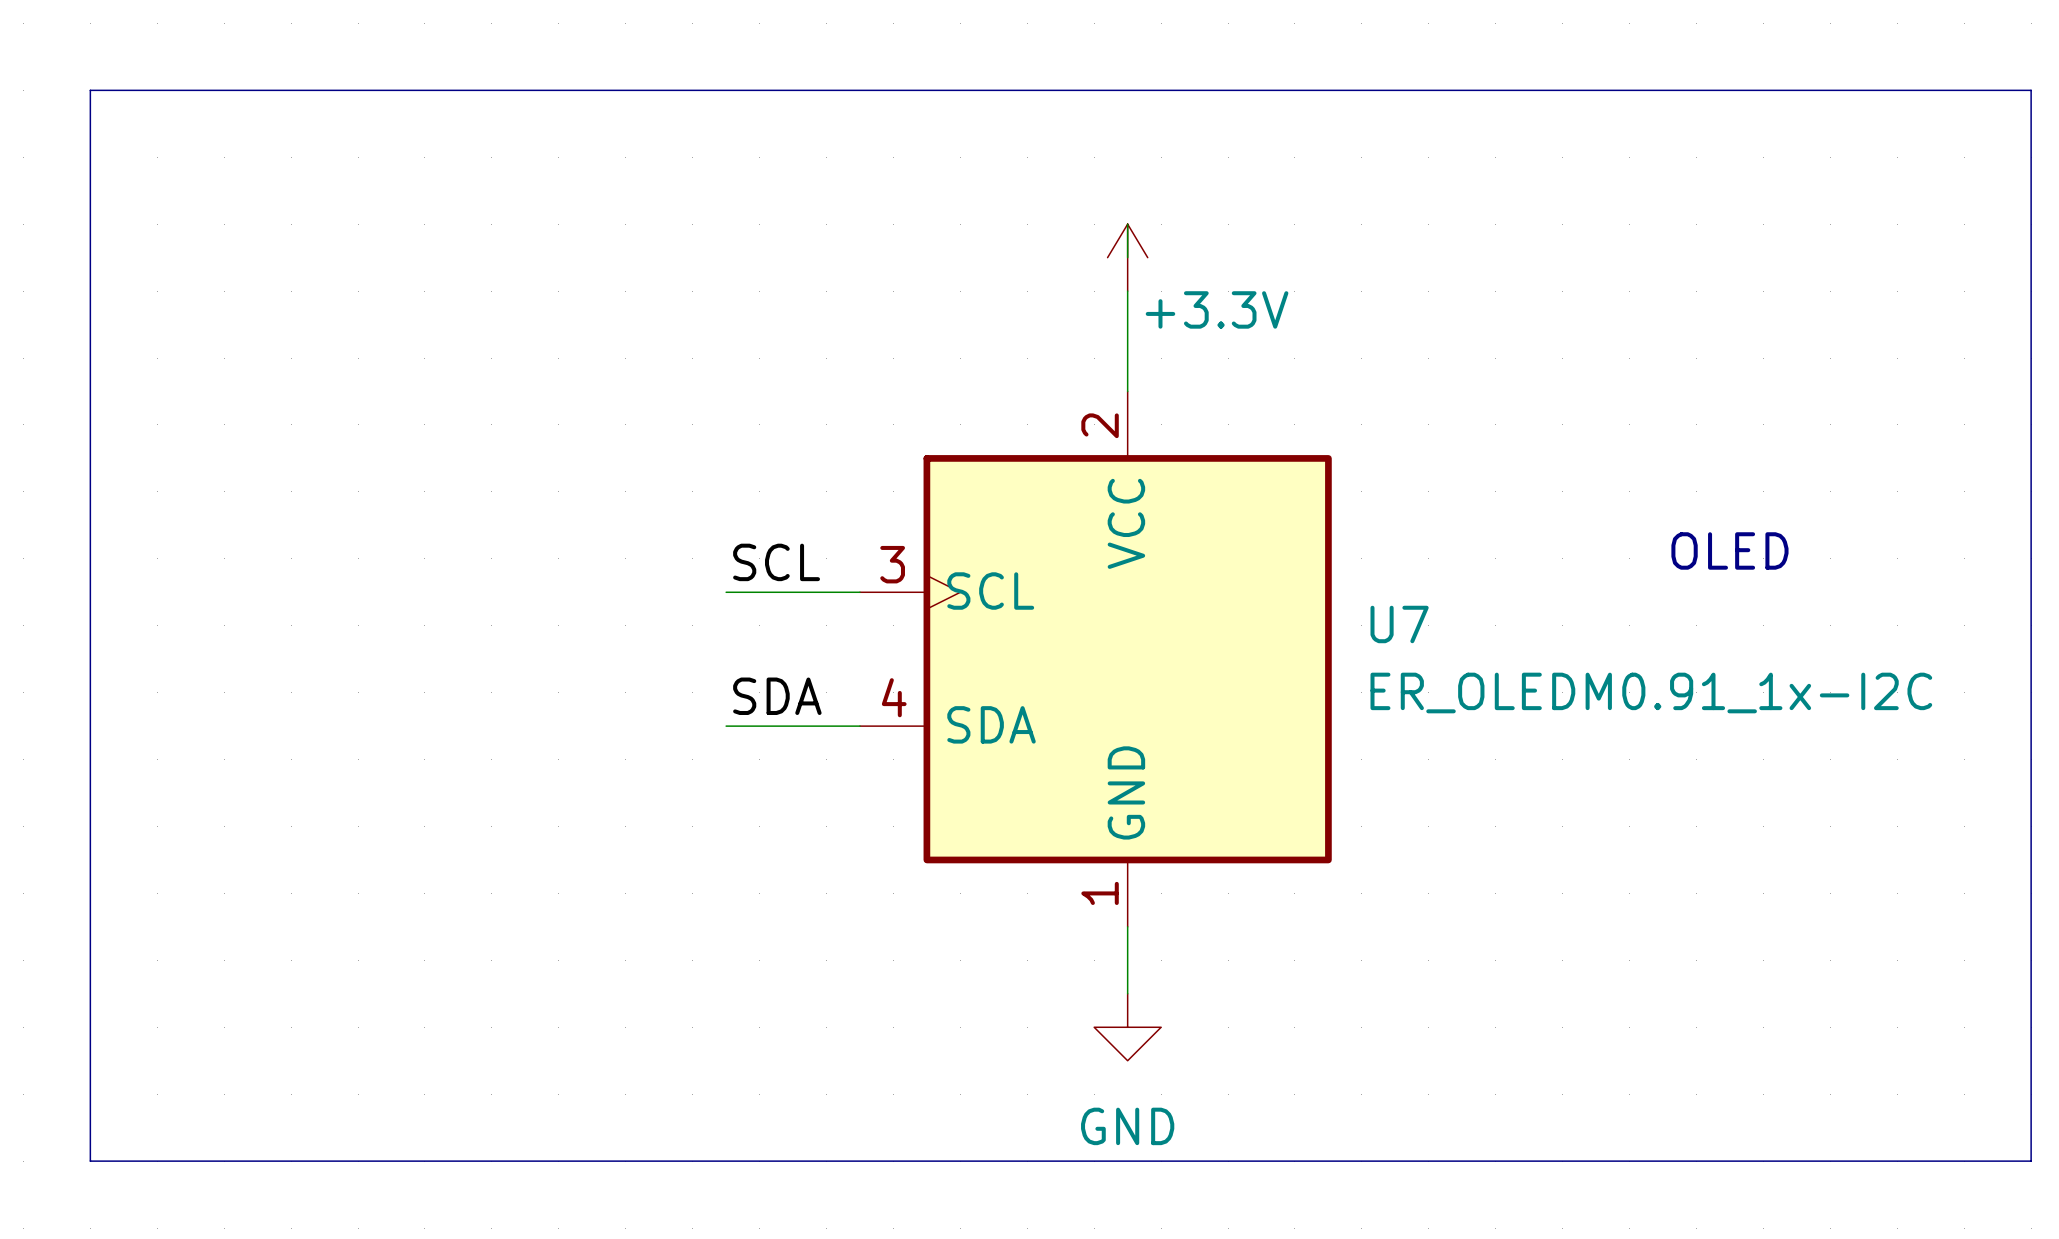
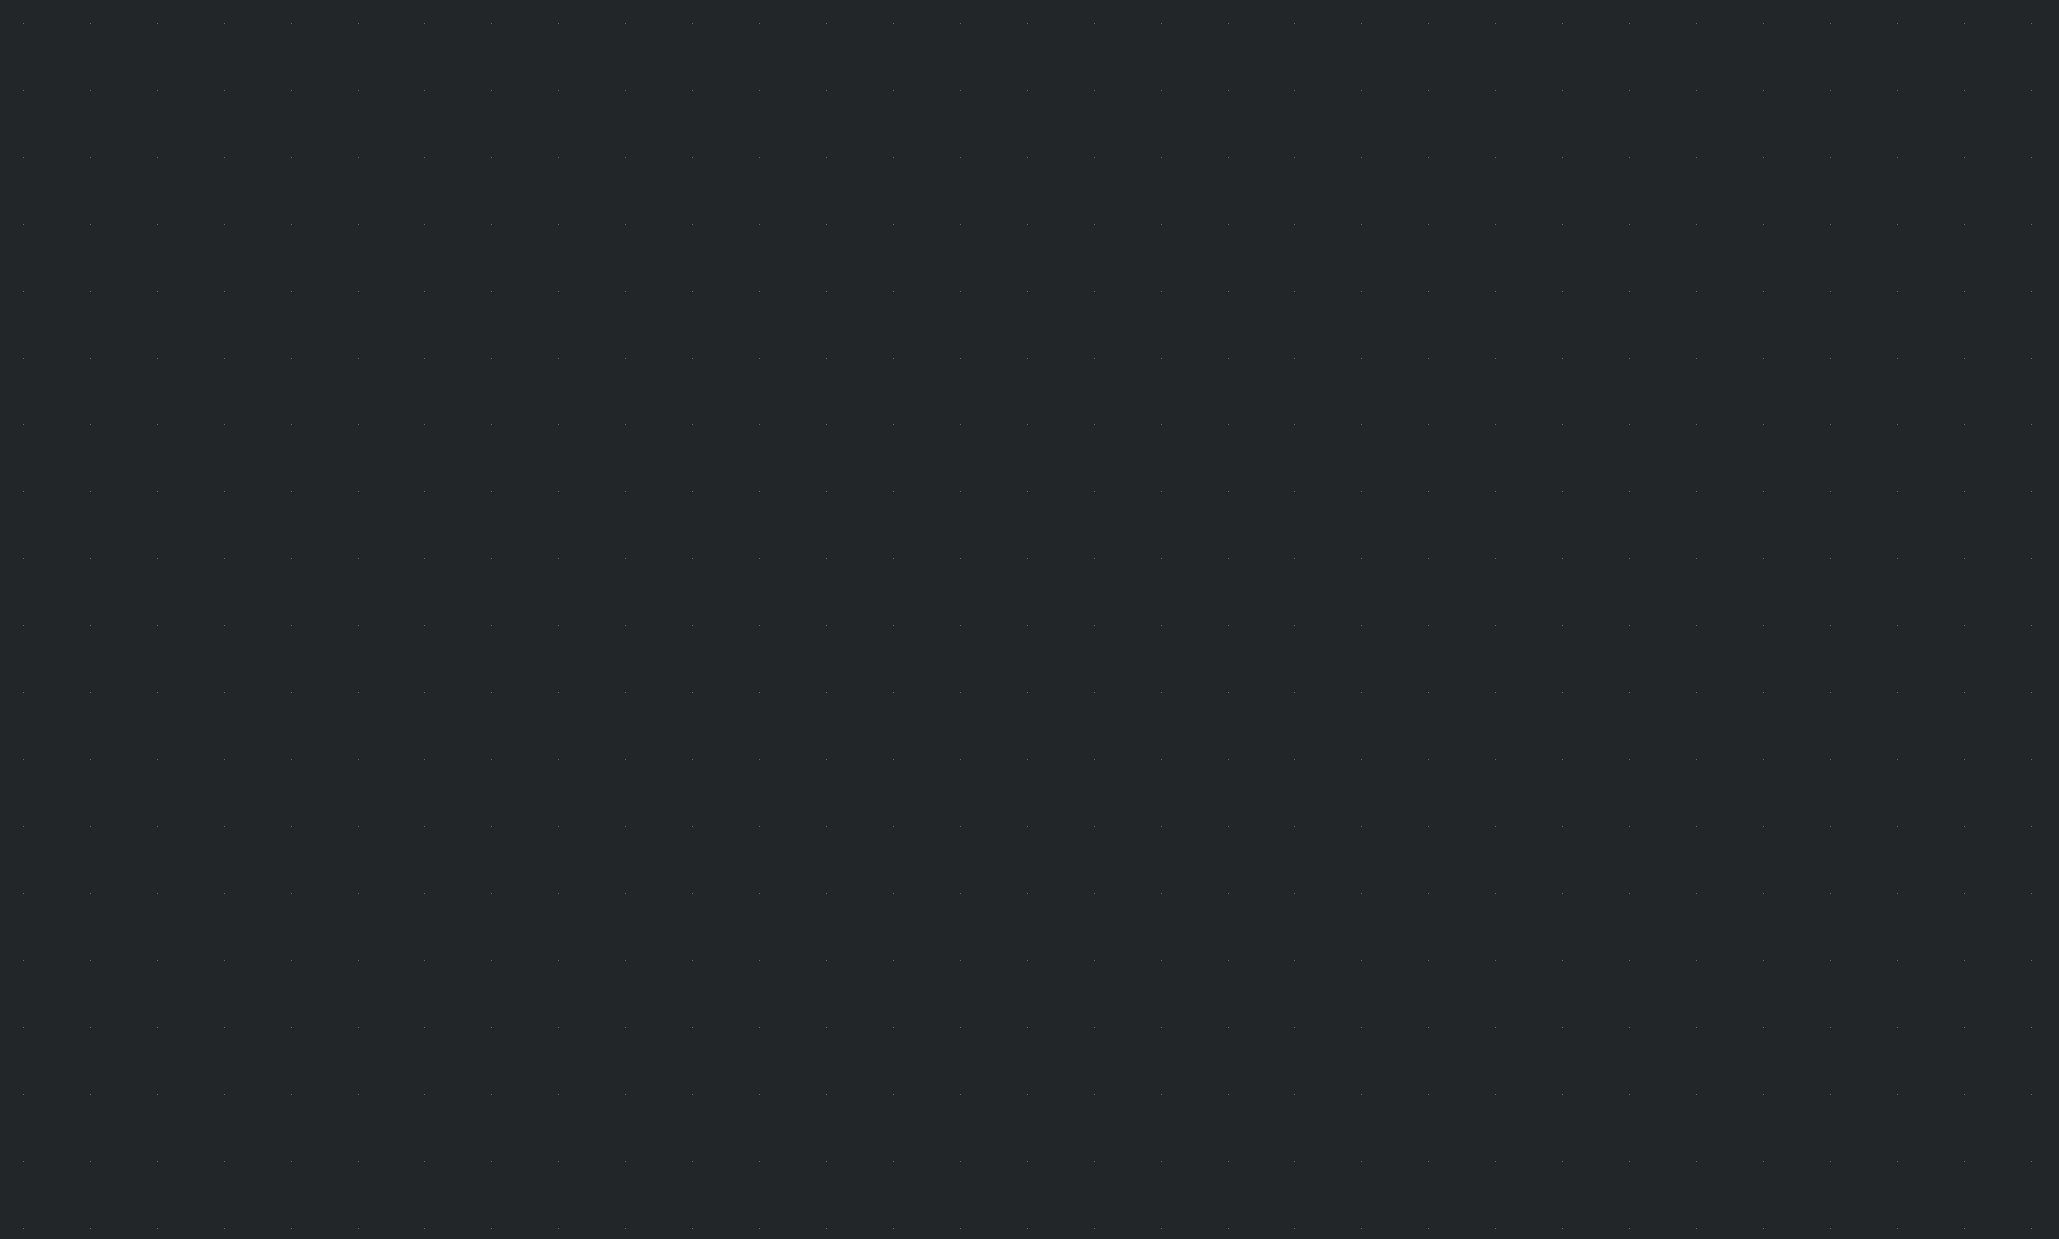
line: (90, 90) (2031, 90) (2031, 1161) (90, 1161) (90, 90) -> none
wire: (1127, 224) (1127, 257) -> none
power symbol: +3.3V (1127, 257) -> none
wire: (1127, 291) (1127, 391) -> none
text: OLED (1729, 550) -> none
label: SCL (776, 562) -> none
wire: (726, 592) (859, 592) -> none
U7: ER_OLEDM0.91_1x-I2C (1095, 659) -> none
label: SDA (777, 696) -> none
wire: (726, 726) (859, 726) -> none
wire: (1127, 926) (1127, 993) -> none
power symbol: GND (1127, 1027) -> none

